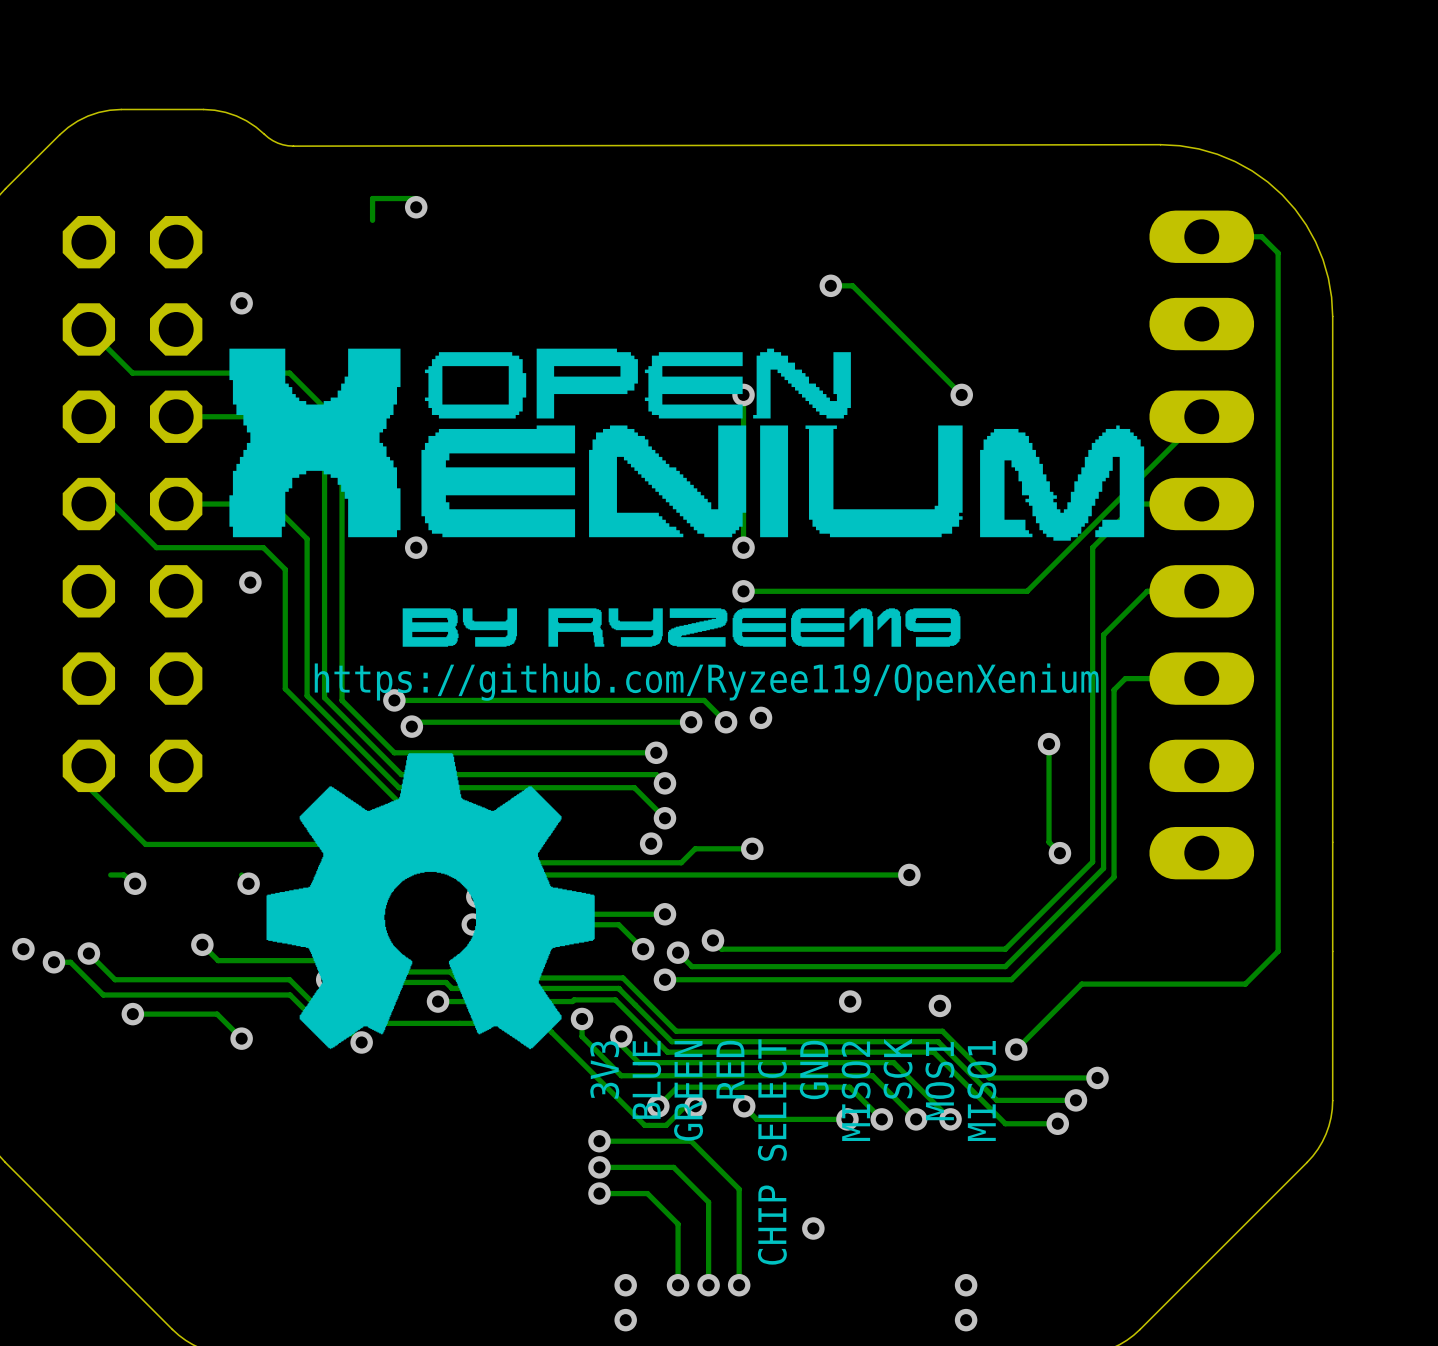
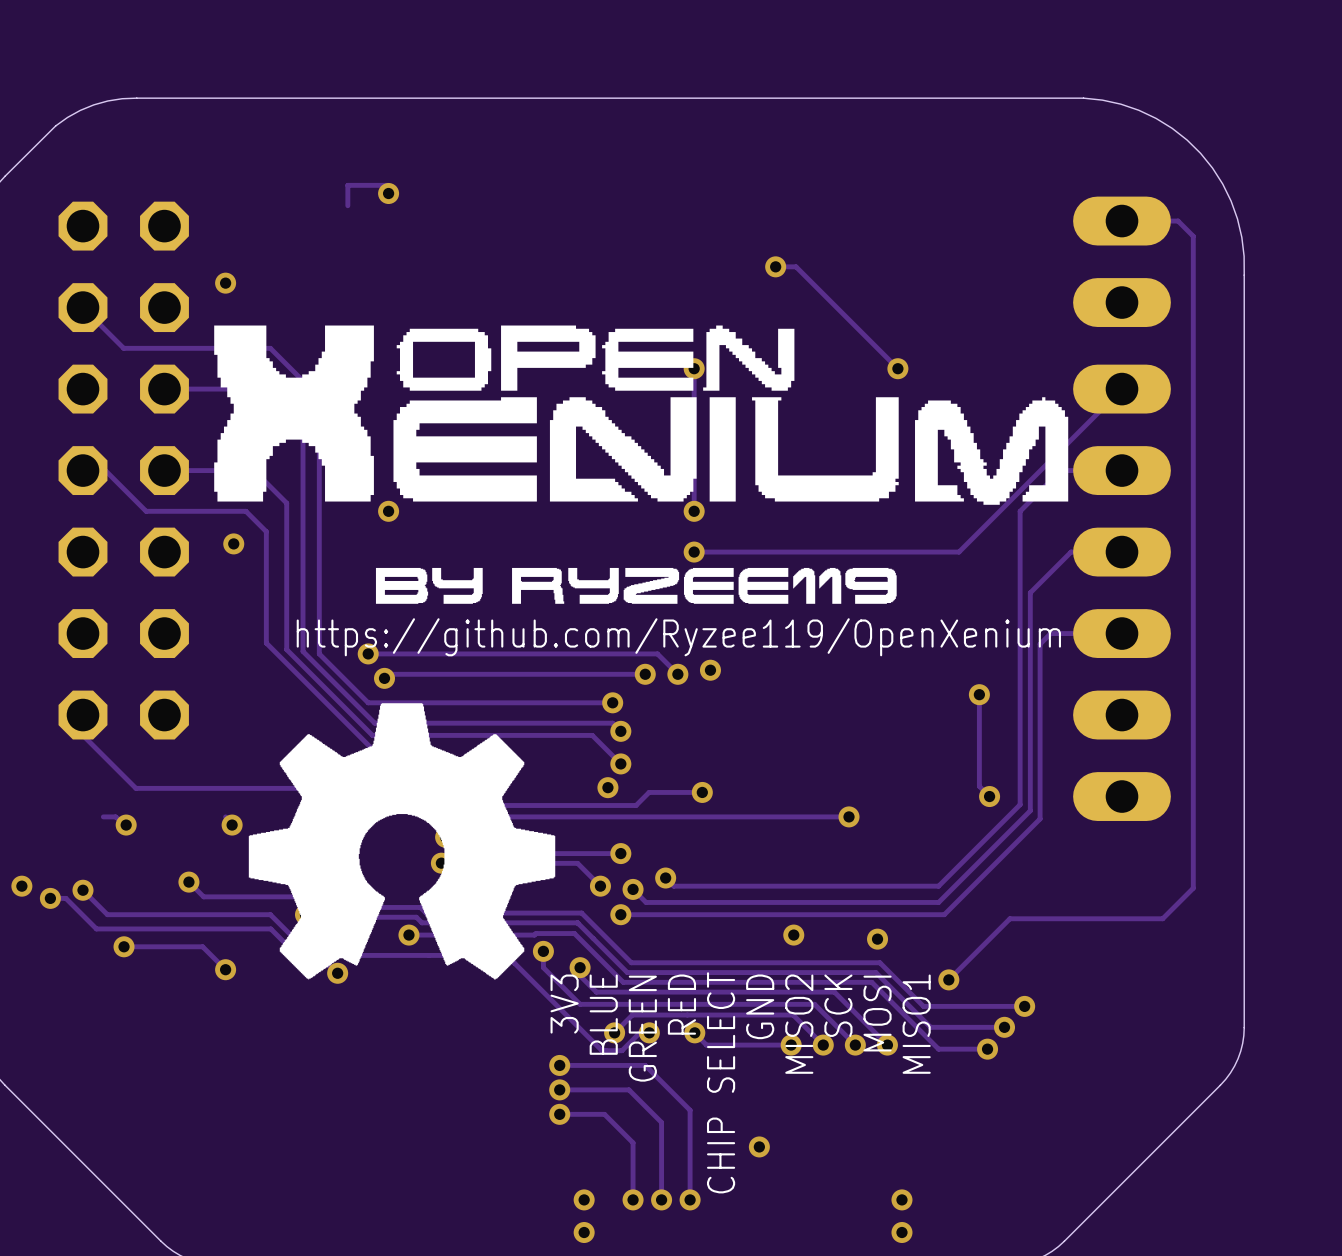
board edge: (59, 134) (77, 121) (109, 110) (203, 109) (236, 115) (255, 127) (273, 140) (293, 146) (1179, 145) (1217, 154) (1252, 170) (1282, 194) (1295, 209) (1306, 225) (1323, 259) (1328, 278) (1332, 316) -> (55, 125) (67, 117) (93, 104) (107, 100) (136, 98) (1083, 98) (1102, 100) (1120, 104) (1156, 118) (1187, 140) (1212, 168) (1222, 184) (1237, 218) (1244, 256) (1244, 295)

